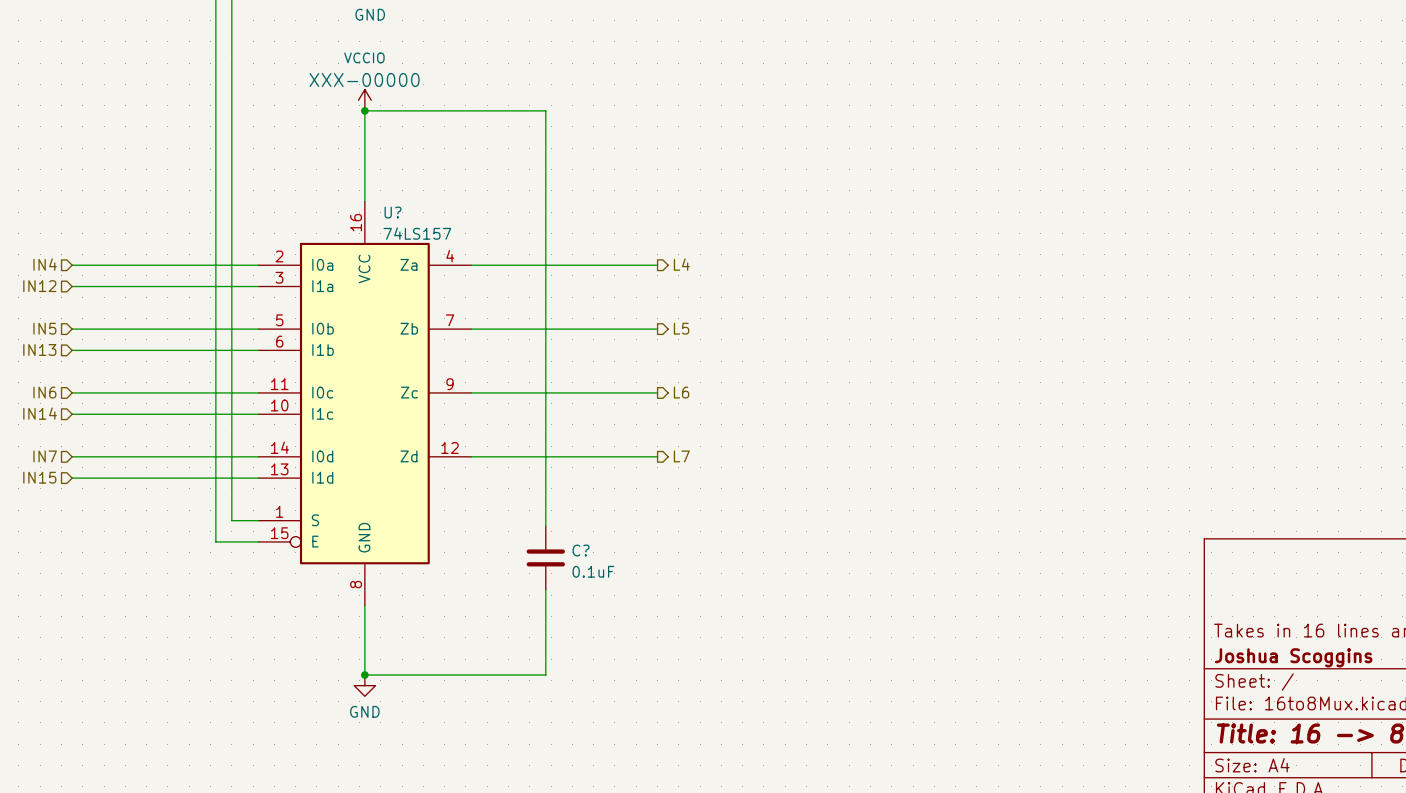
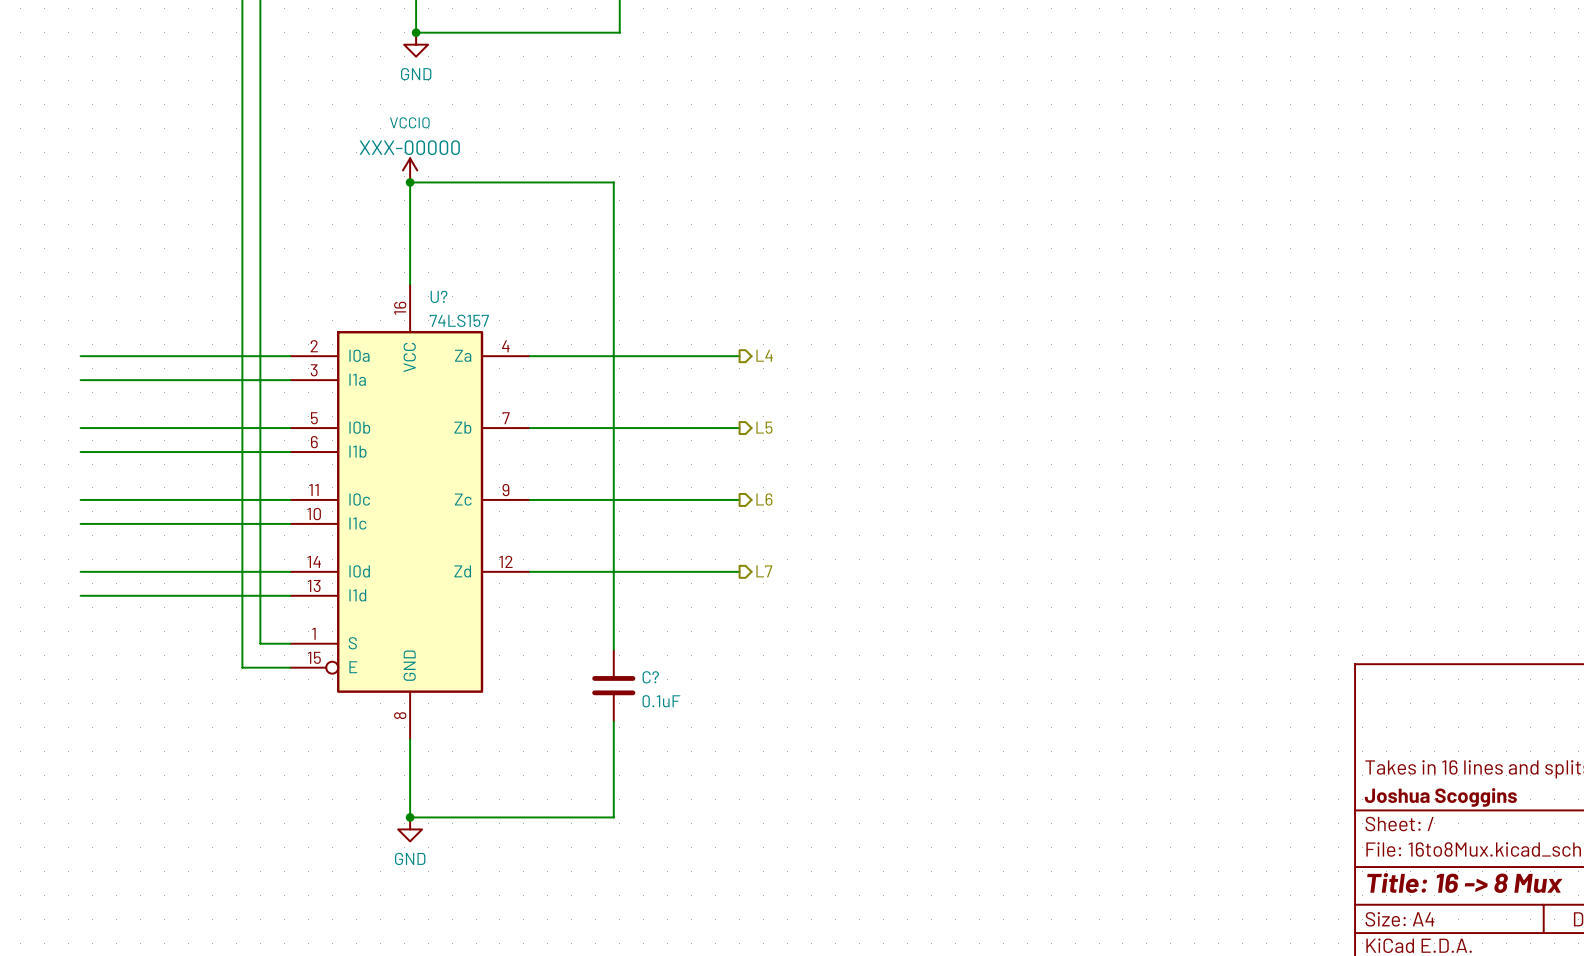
hierarchical label: IN4 (45, 264) -> none
hierarchical label: IN12 (39, 286) -> none
hierarchical label: IN5 (44, 328) -> none
hierarchical label: IN13 (39, 349) -> none
hierarchical label: IN6 (44, 392) -> none
hierarchical label: IN14 (40, 413) -> none
hierarchical label: IN7 (45, 456) -> none
hierarchical label: IN15 (39, 477) -> none

